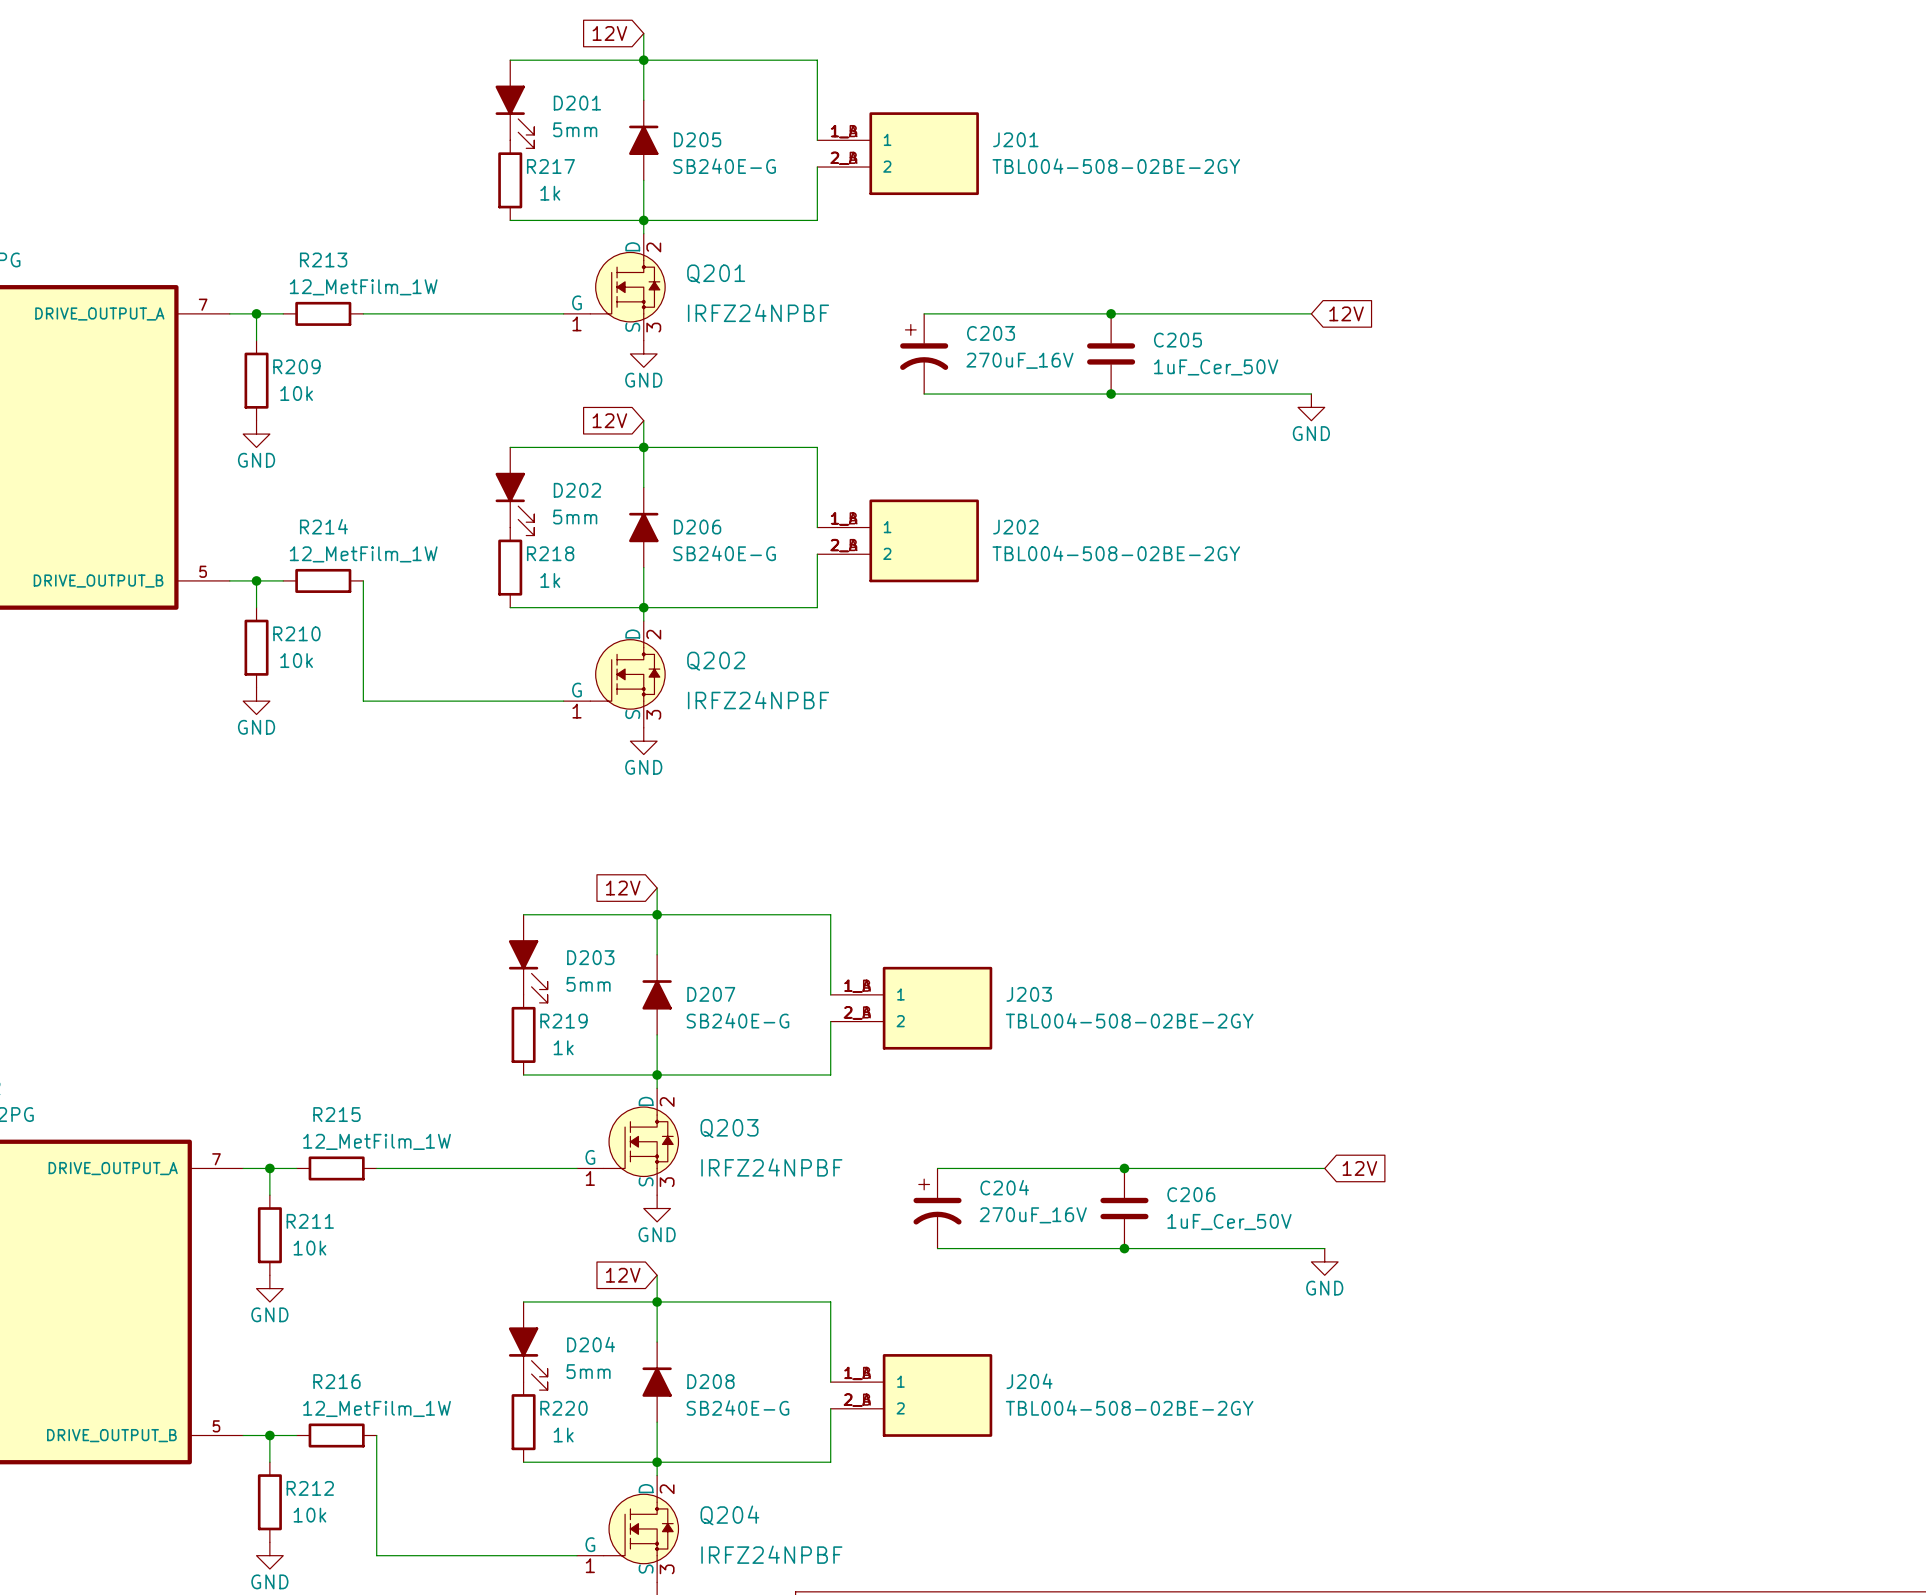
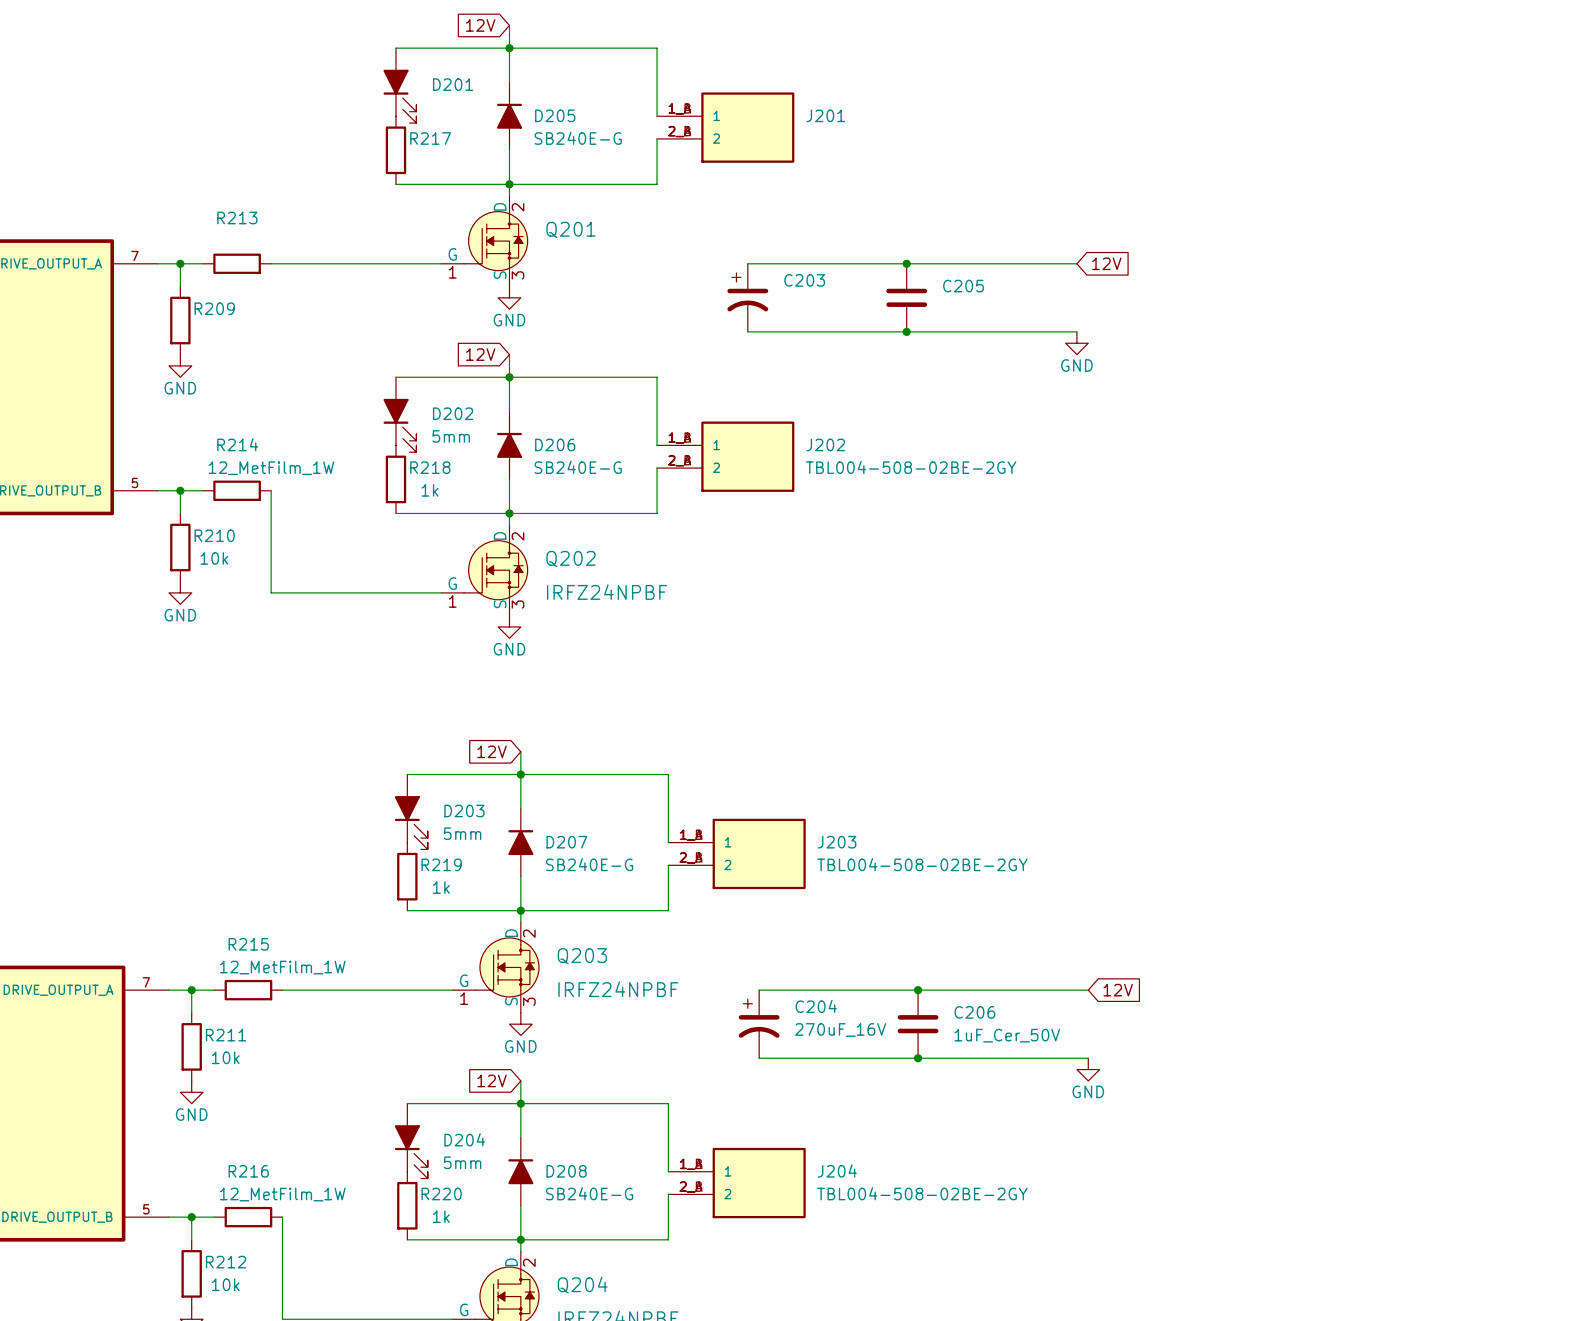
D201 value: 5mm (575, 129) -> none
J201 value: TBL004-508-02BE-2GY (1116, 166) -> none
R217 value: 1k (550, 193) -> none
R213 value: 12_MetFilm_1W (363, 287) -> none
Q201 value: IRFZ24NPBF (758, 312) -> none
C203 value: 270uF_16V (1019, 360) -> none
C205 value: 1uF_Cer_50V (1216, 367) -> none
R209 value: 10k (296, 393) -> none

